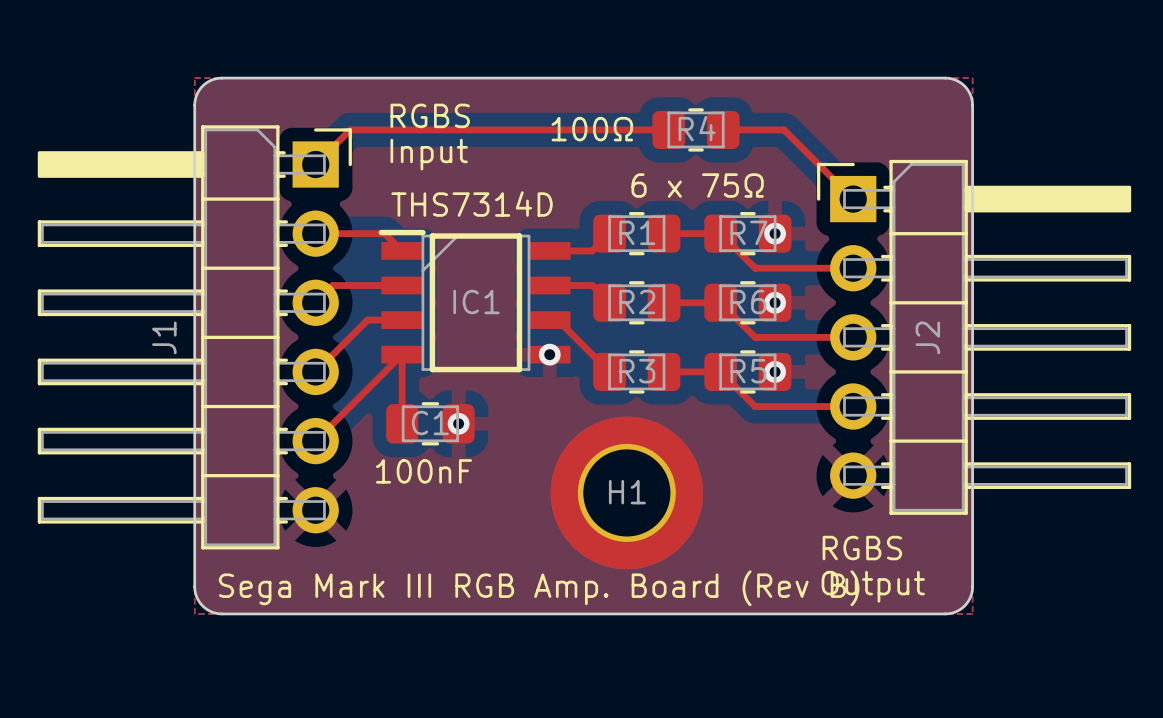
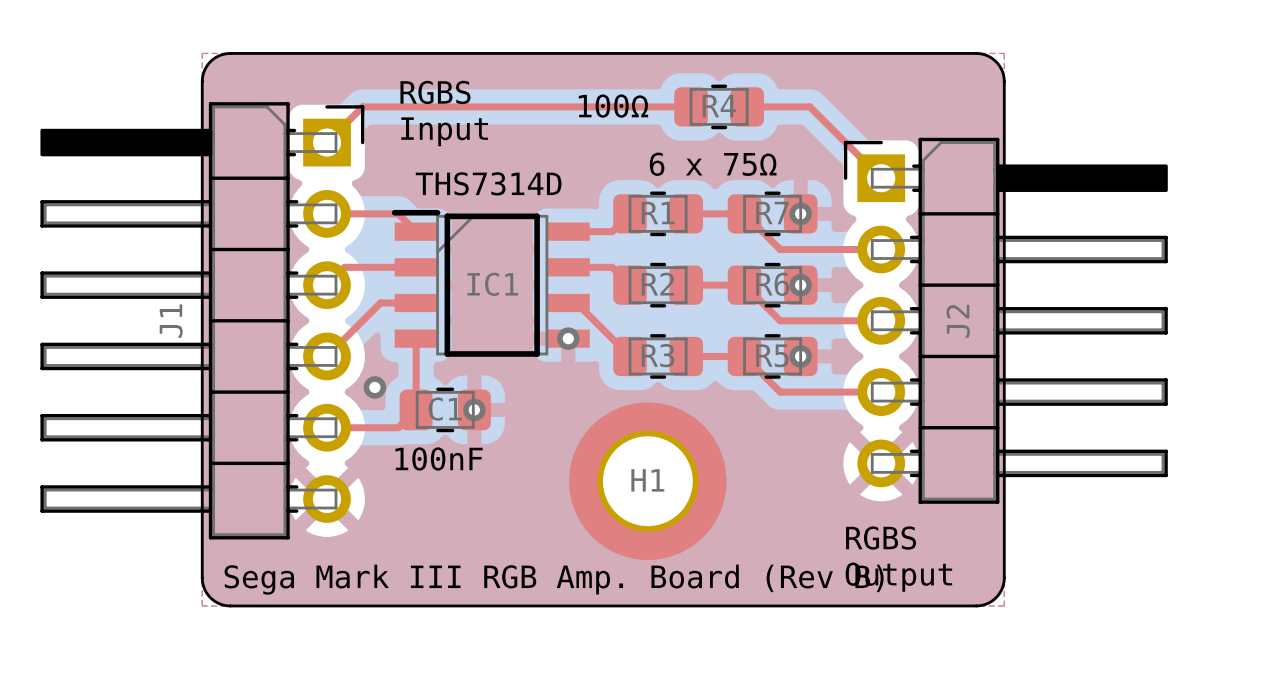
top track: (402, 354) (315, 441) -> (416, 409) (398, 427) (327, 427)
via: none -> (374, 387)

